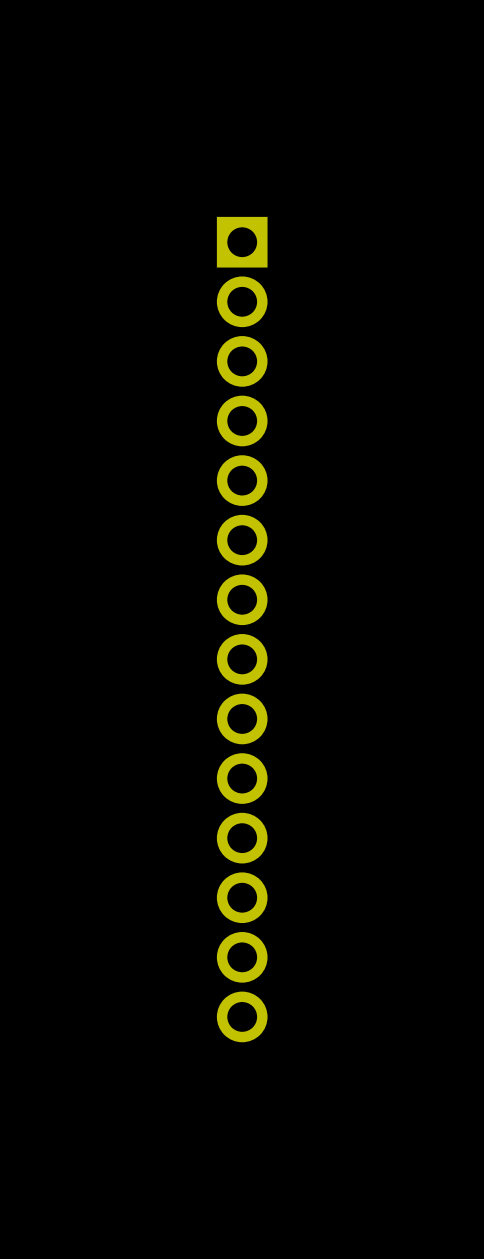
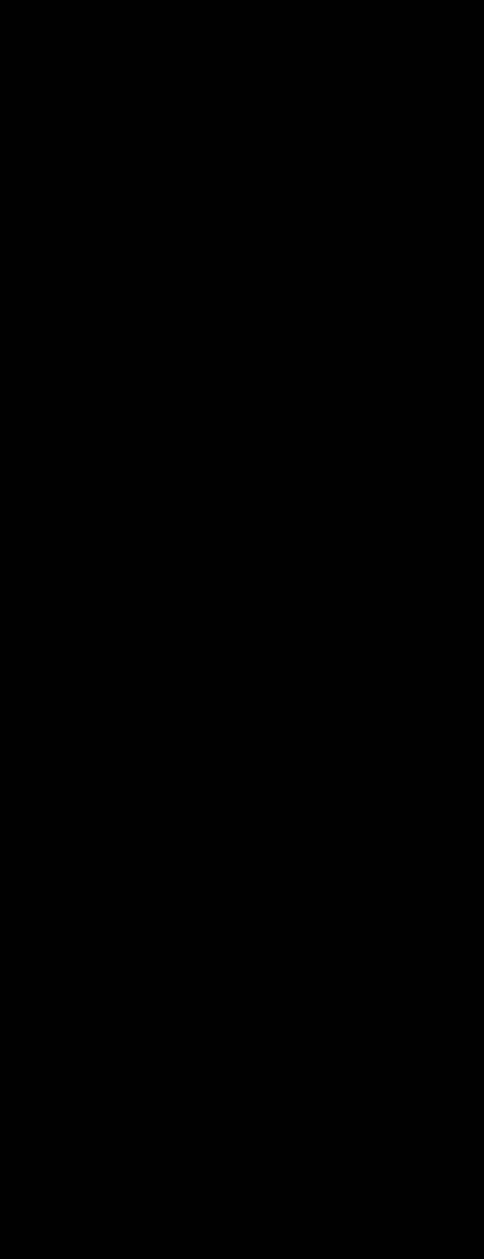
part: (242, 629) -> none

